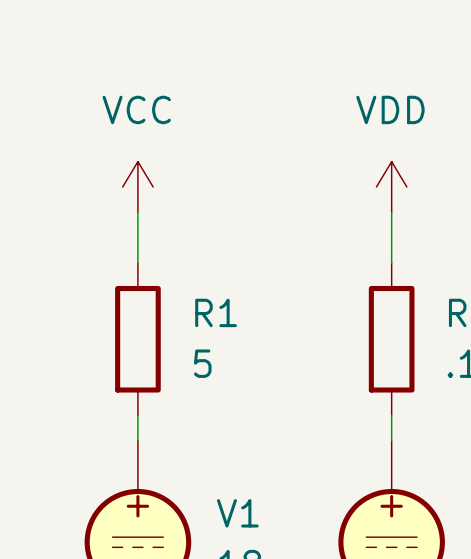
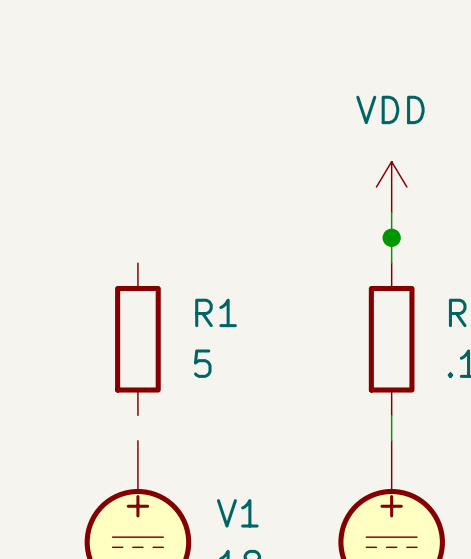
power symbol: VCC (137, 187) -> none
wire: (137, 212) (137, 263) -> none
junction: none -> (391, 237)
wire: (137, 415) (137, 440) -> none

